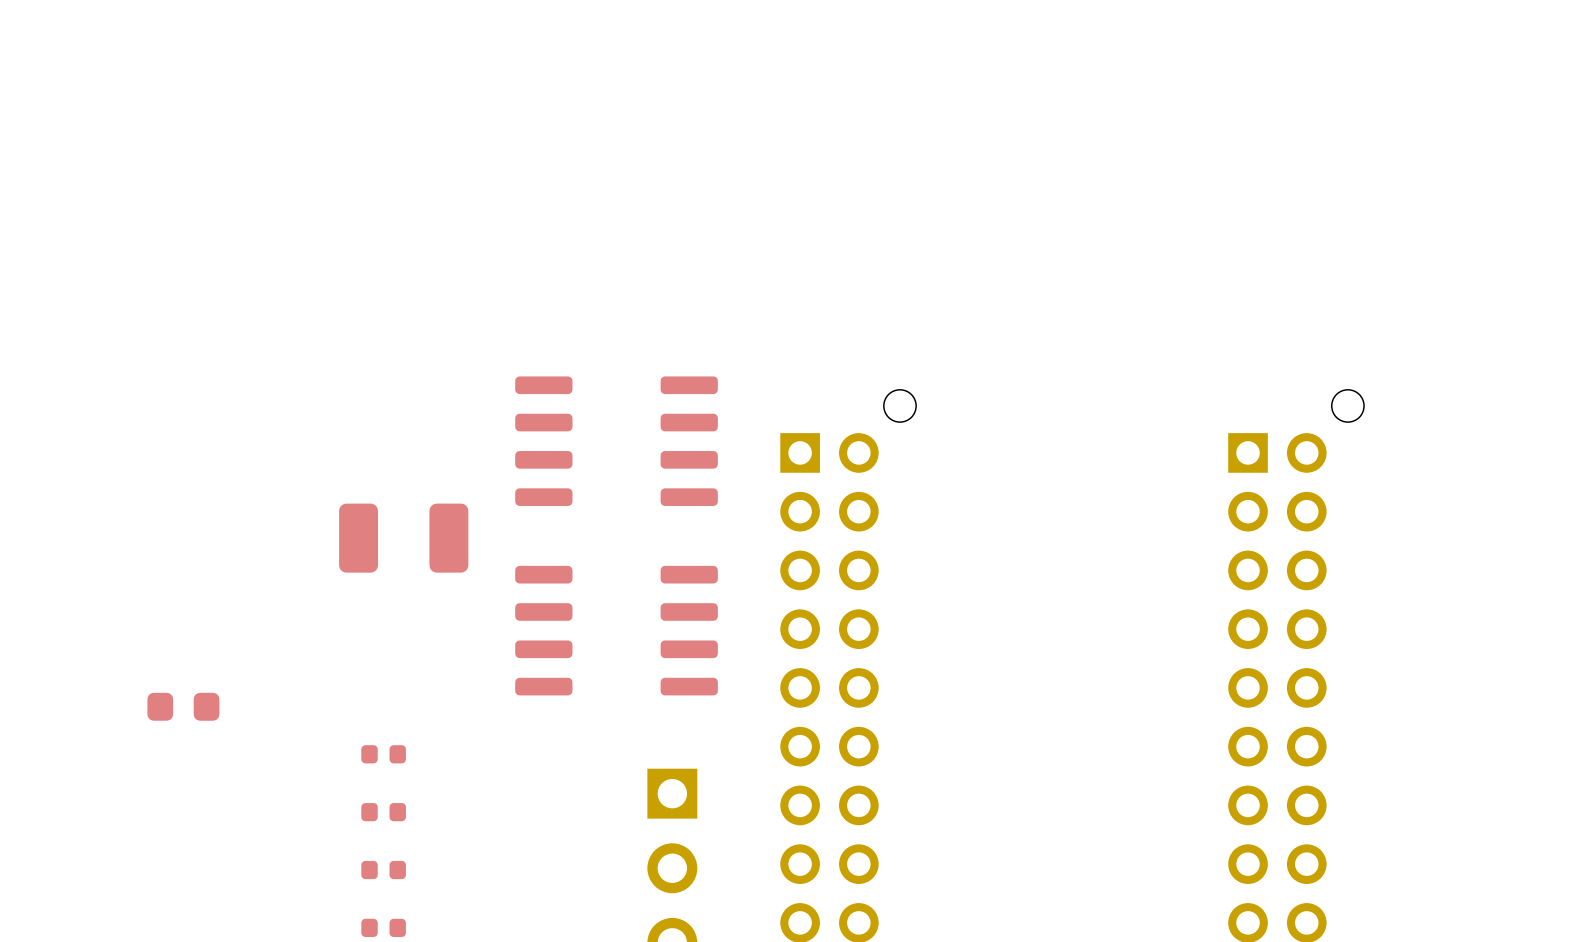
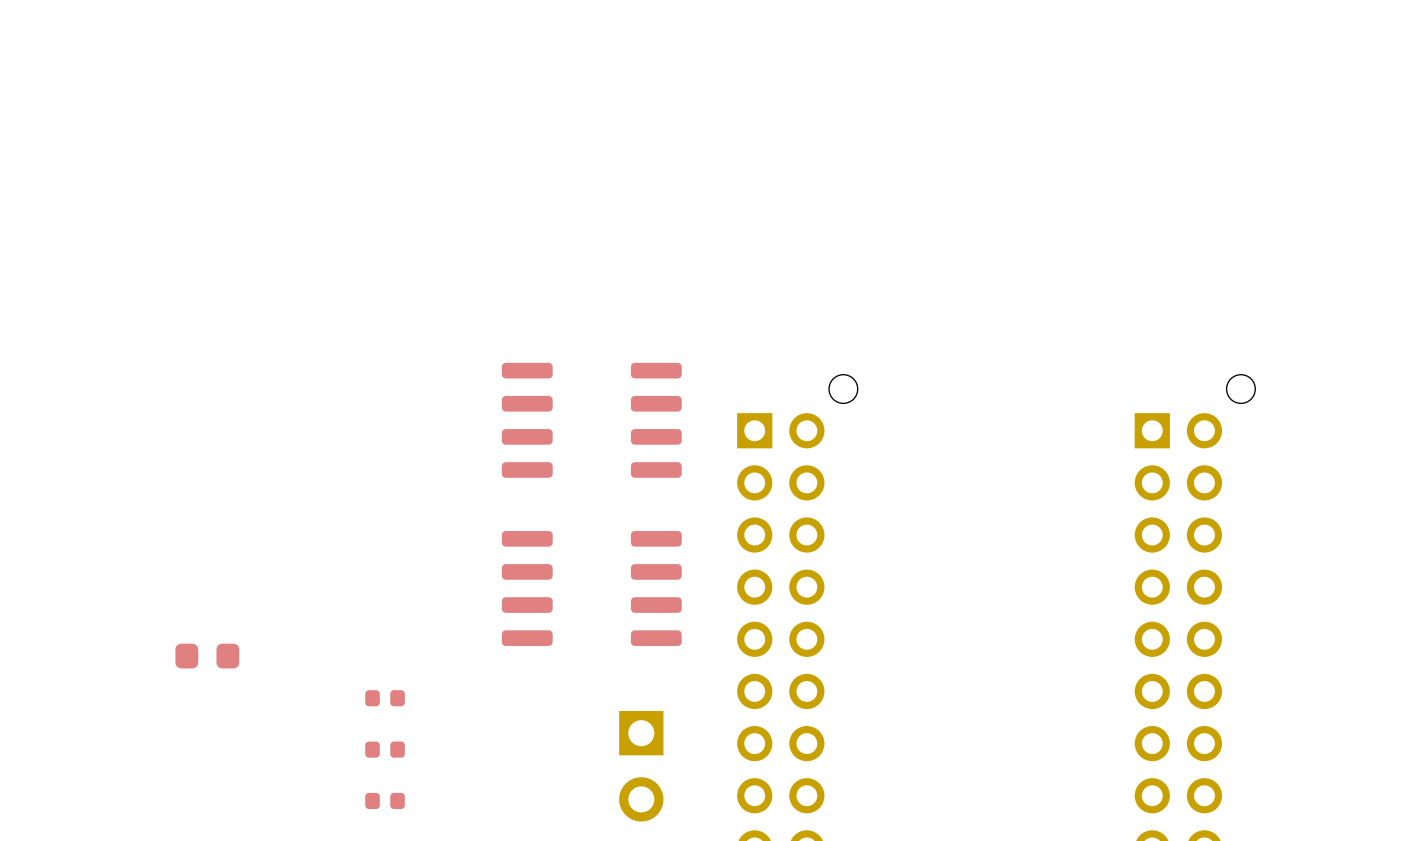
part: (403, 538) -> none

